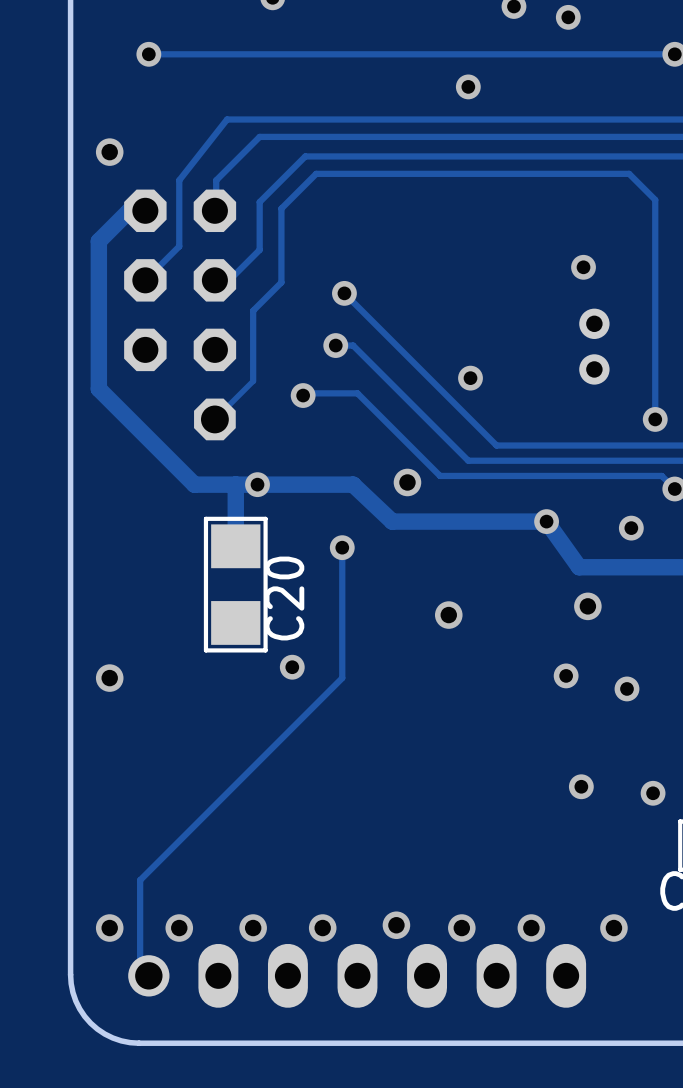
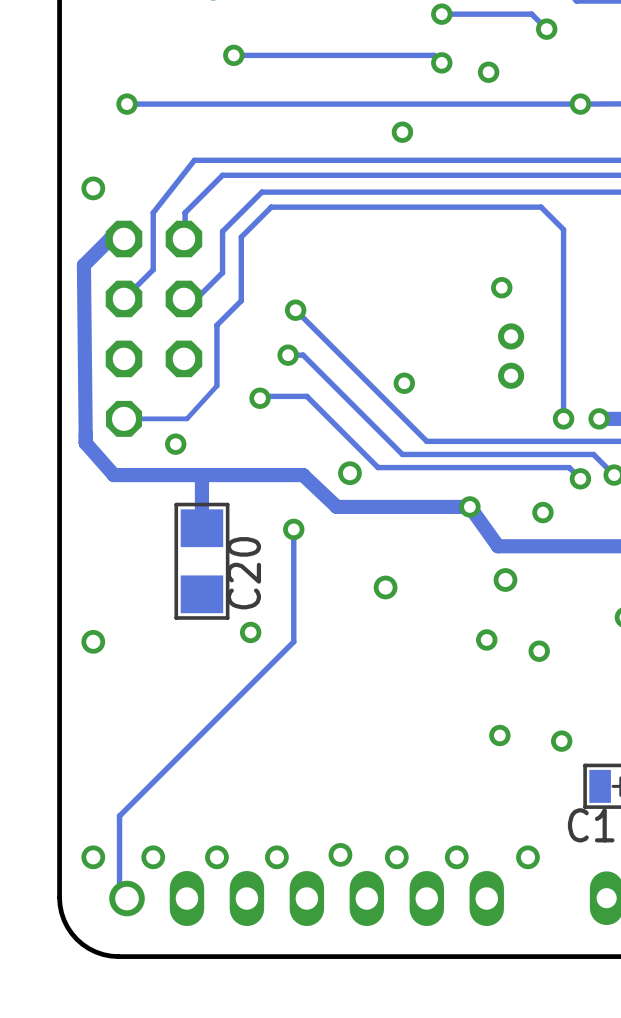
track: (98, 241) (98, 389) (194, 484) -> (83, 265) (85, 443)
track: (253, 381) (214, 419) -> (216, 385) (186, 418) (124, 418)
part position: (214, 419) -> (124, 418)
track: none -> (85, 443) (113, 475) (166, 475)
via position: (257, 484) -> (175, 444)

